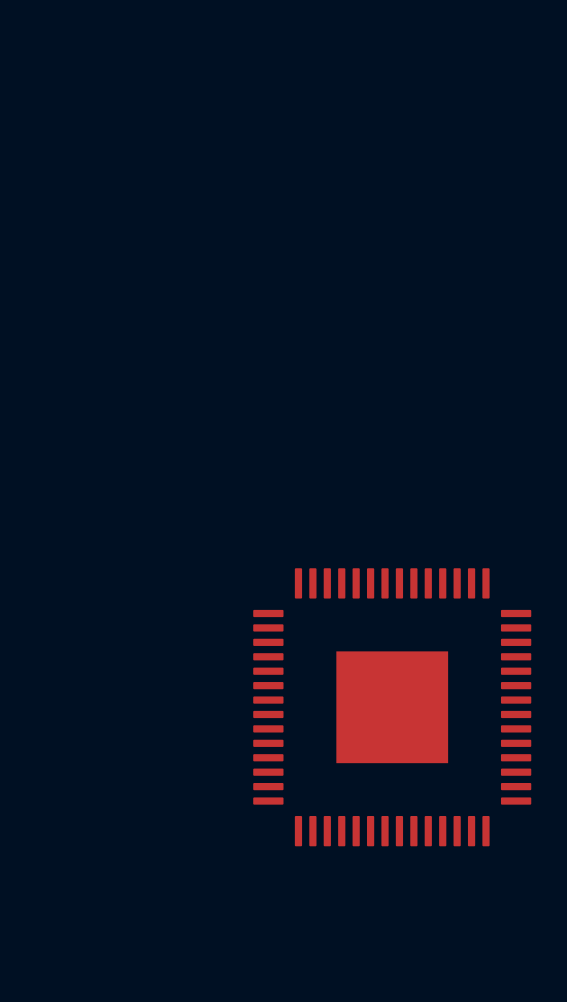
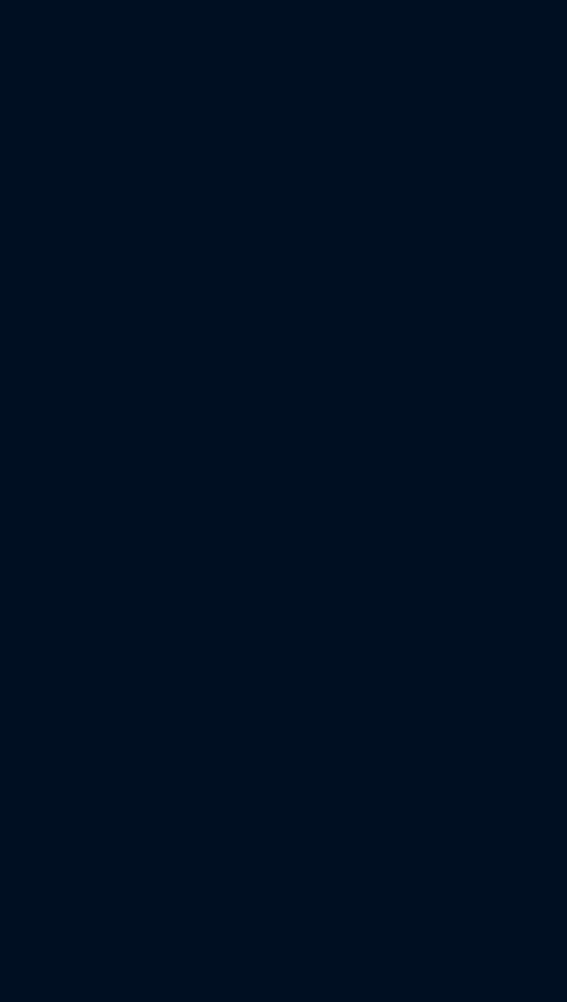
part: (392, 707) -> none

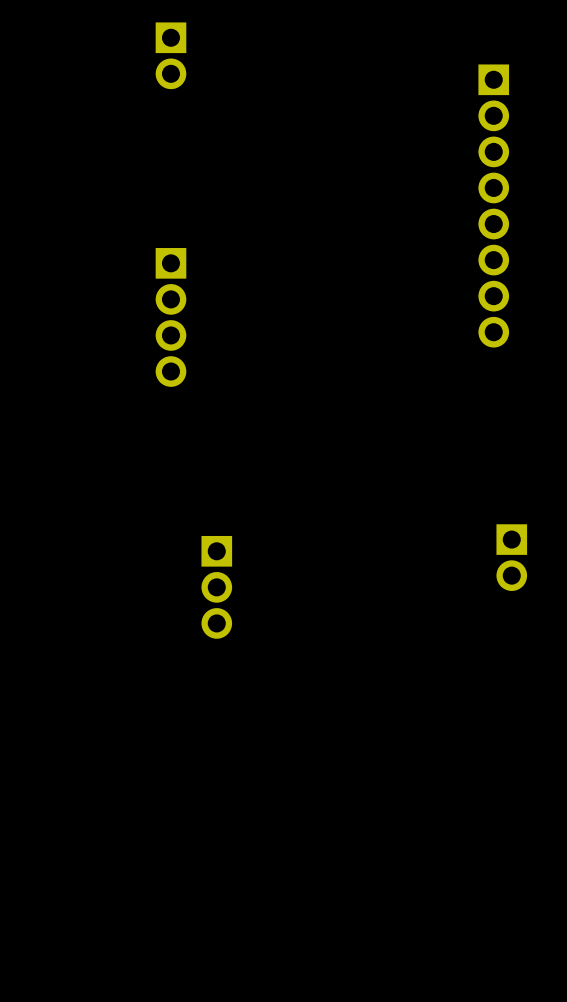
part: none -> (170, 55)
part: none -> (493, 206)
part: none -> (170, 317)
part: none -> (511, 557)
part: none -> (216, 587)

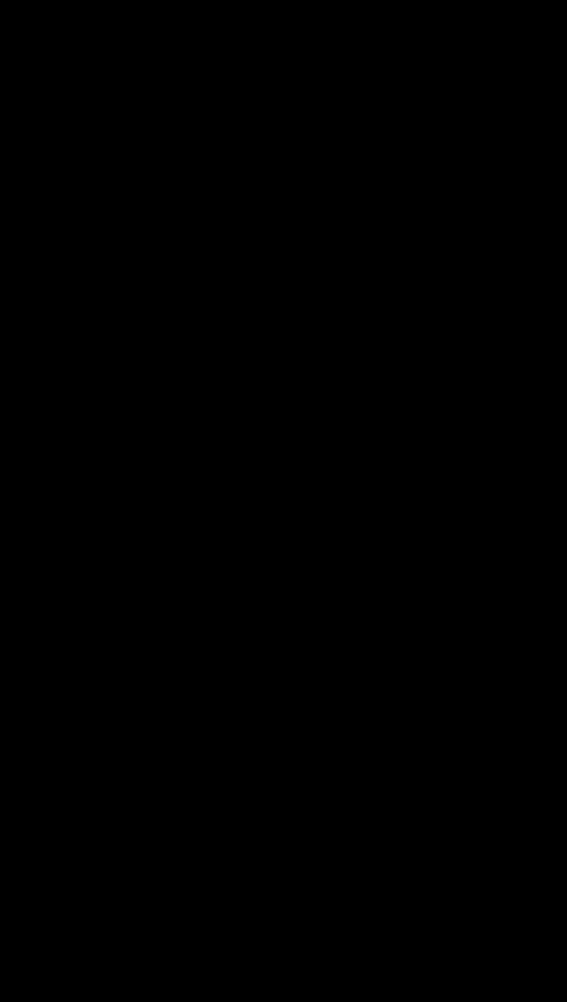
part: (170, 55) -> none
part: (493, 206) -> none
part: (170, 317) -> none
part: (511, 557) -> none
part: (216, 587) -> none

